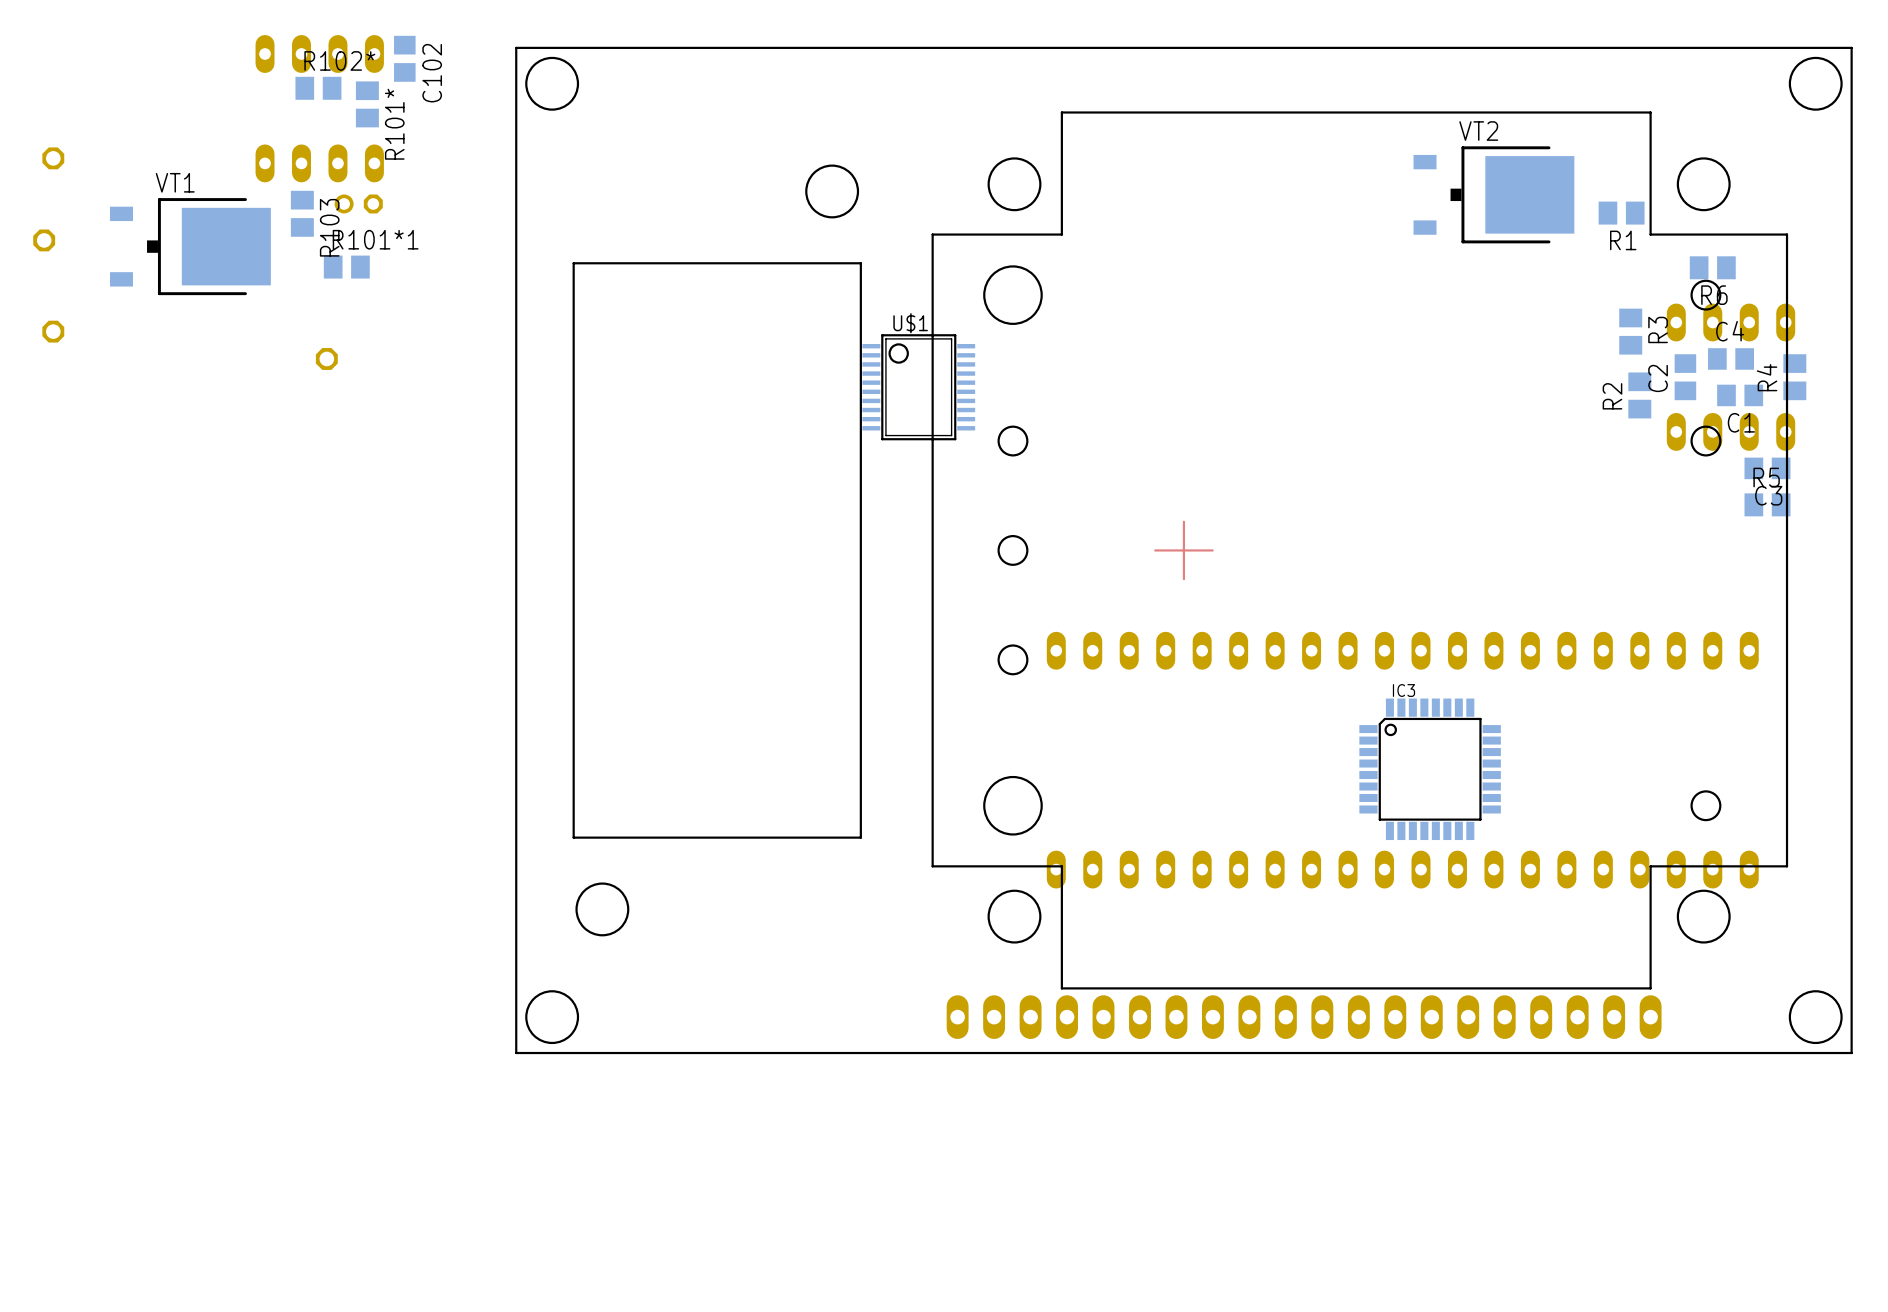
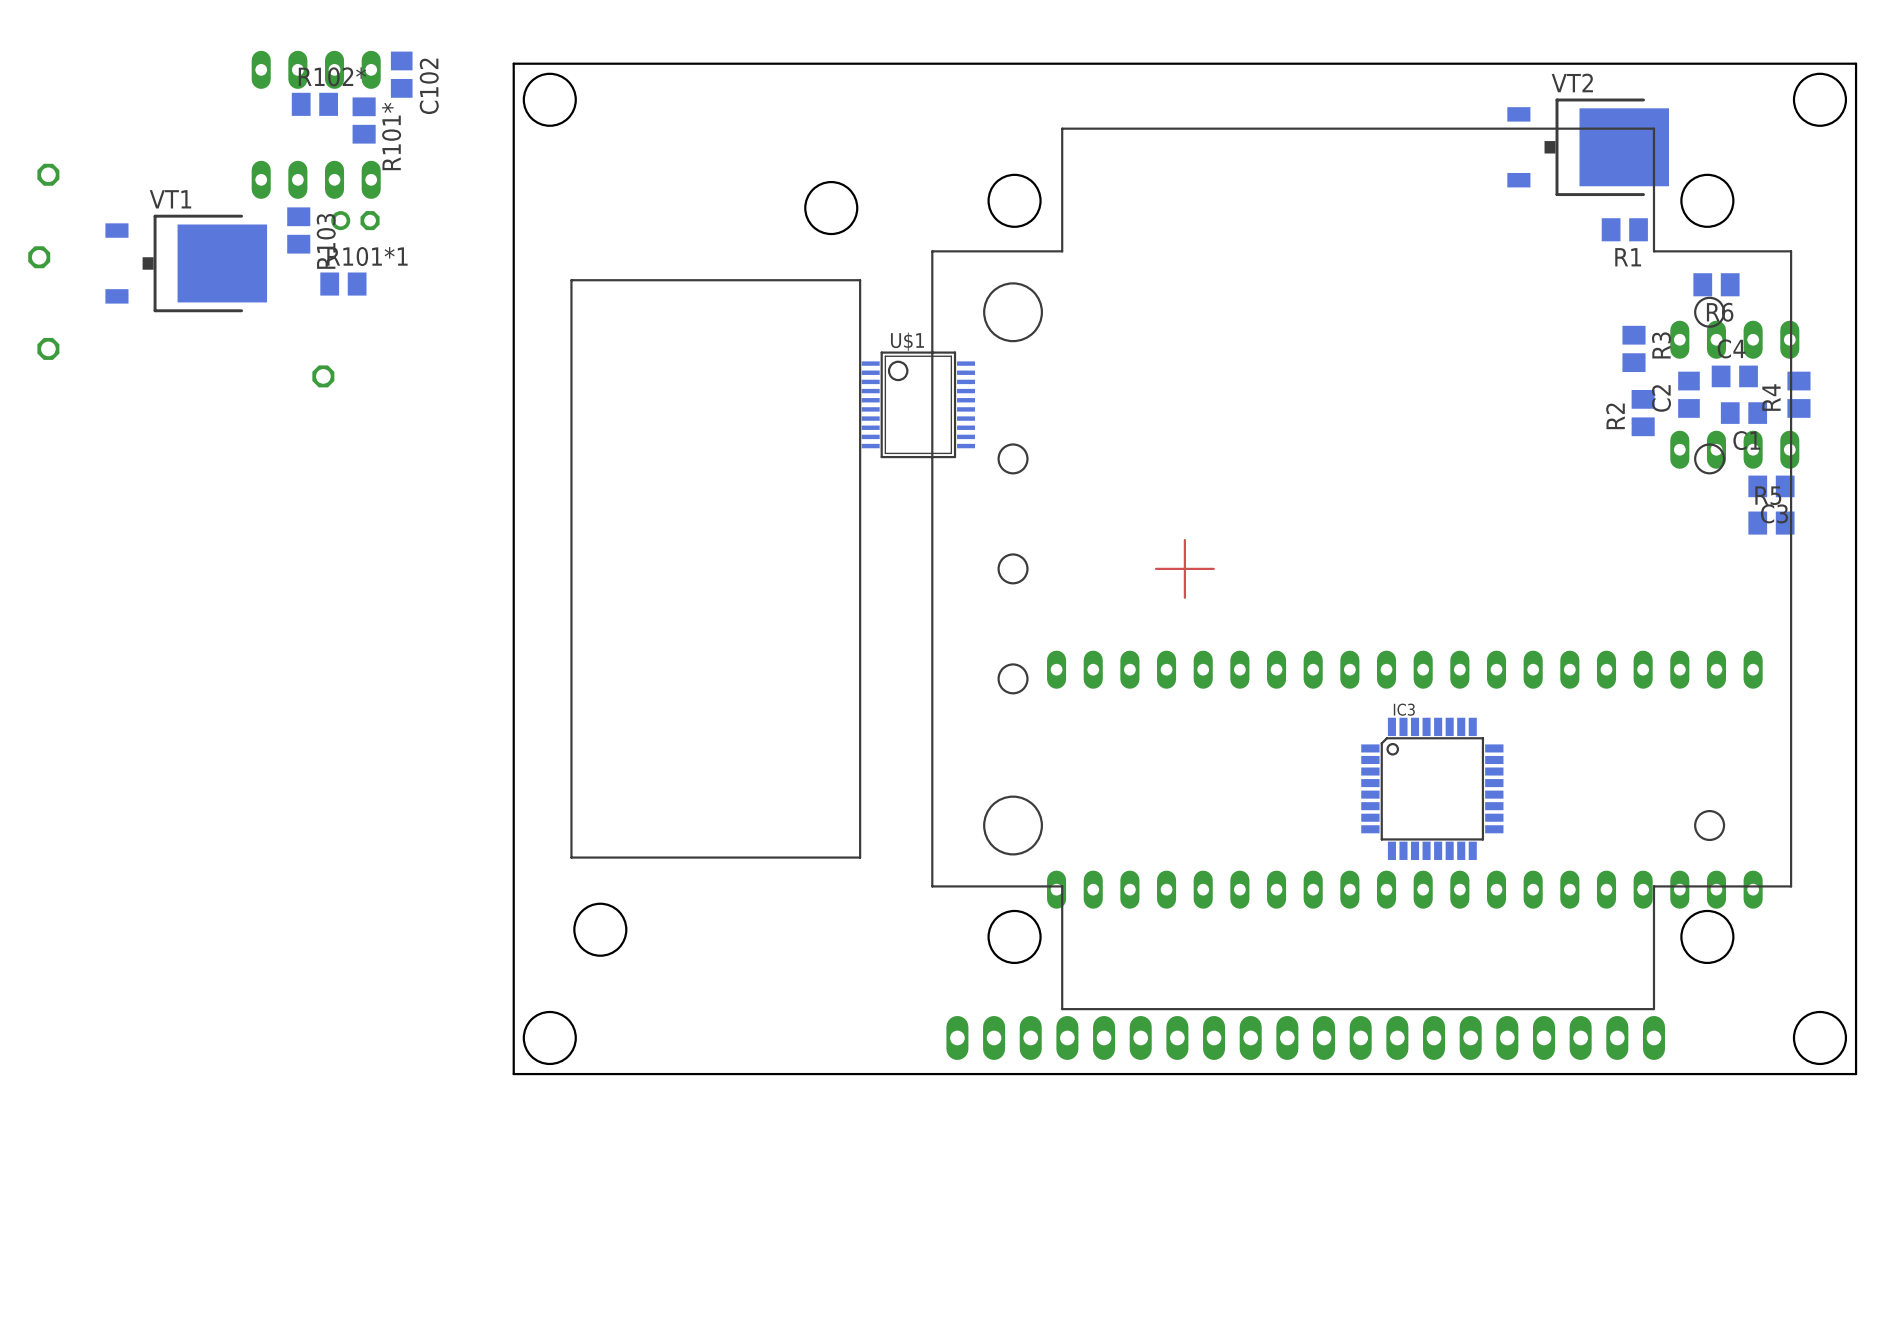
VT2 position: (1493, 194) -> (1588, 147)

